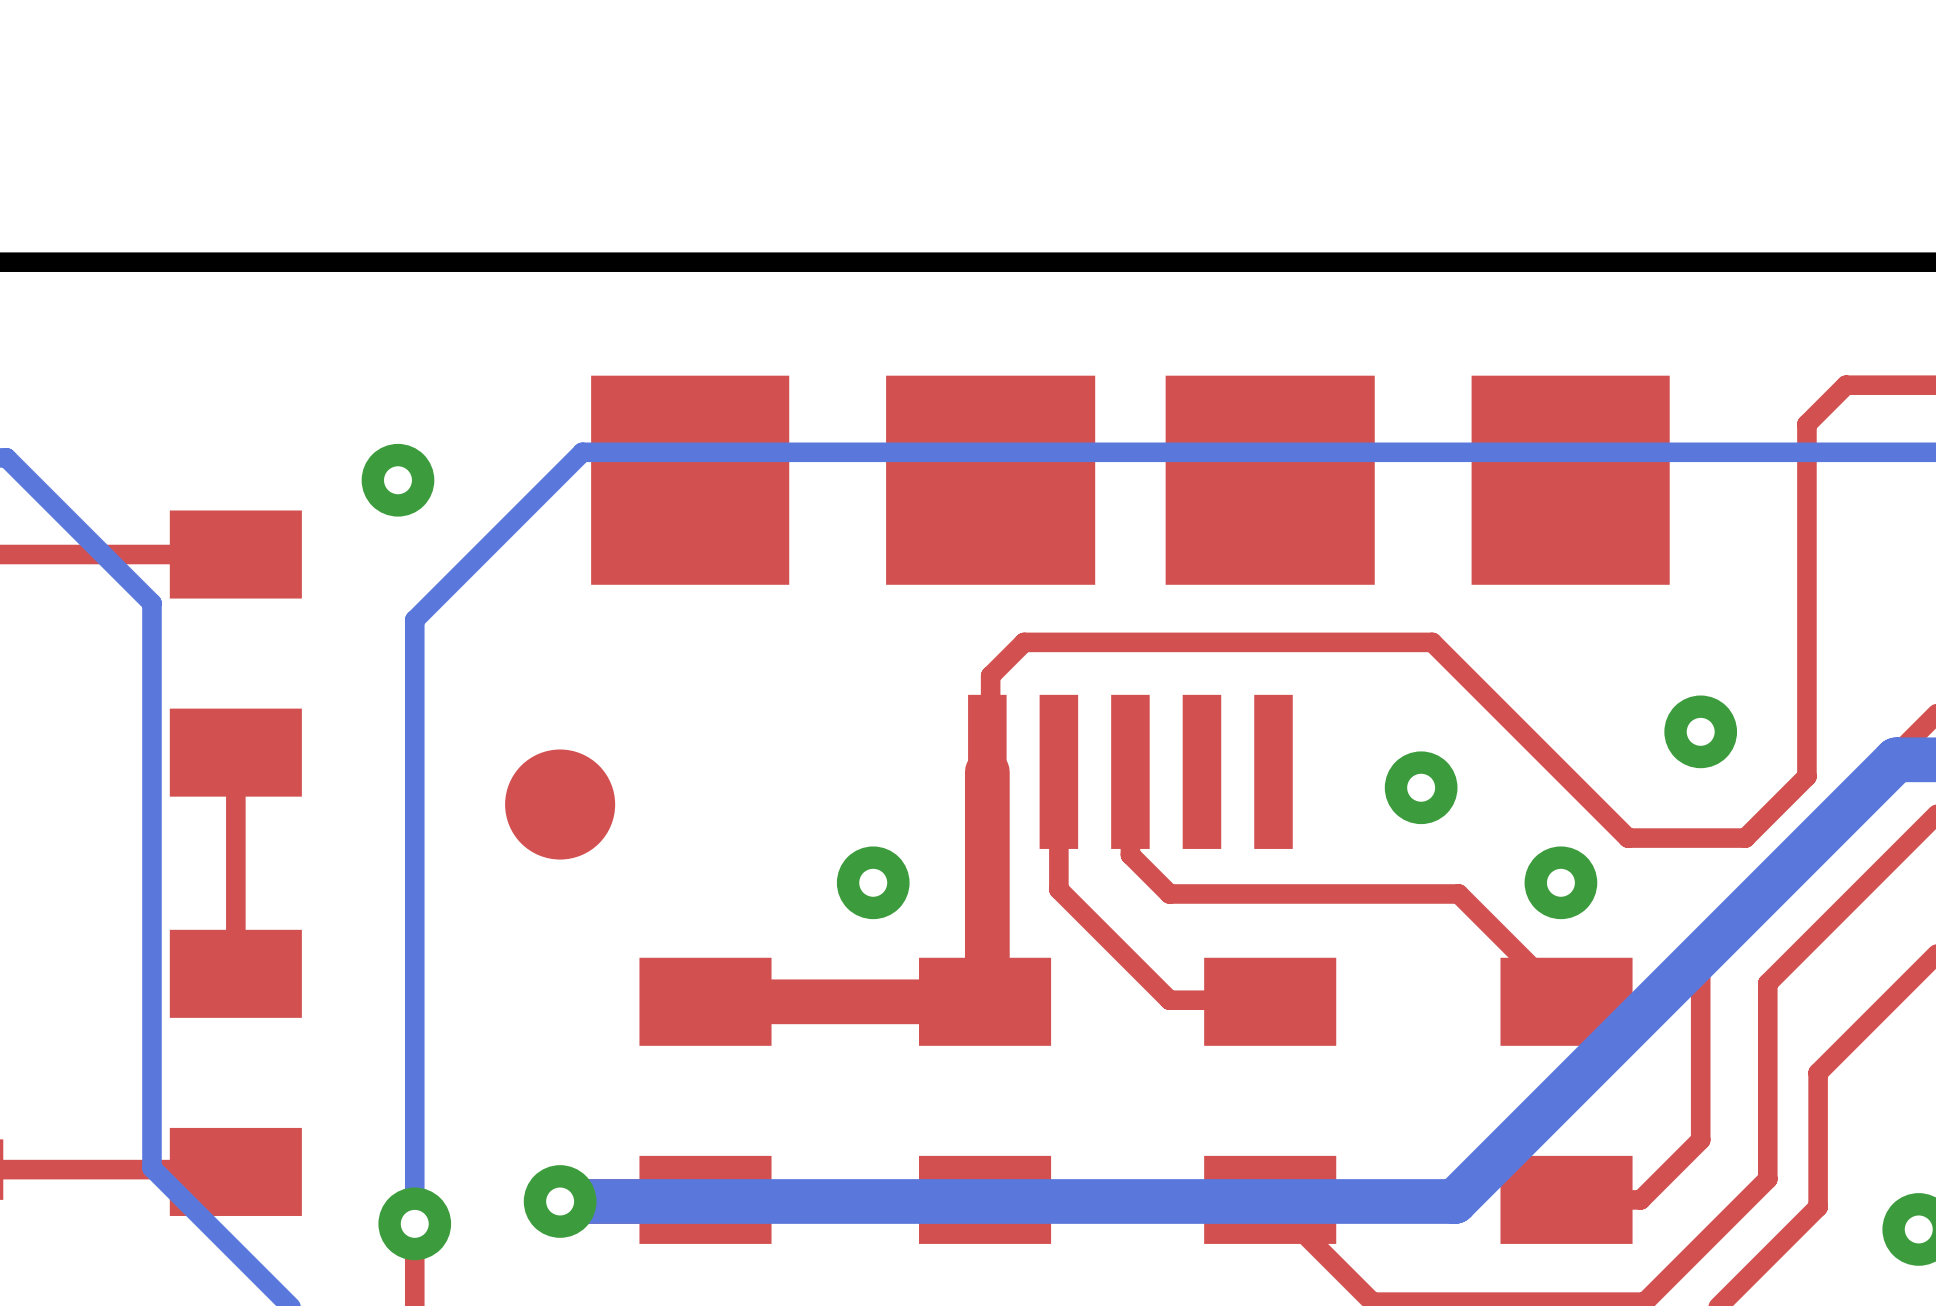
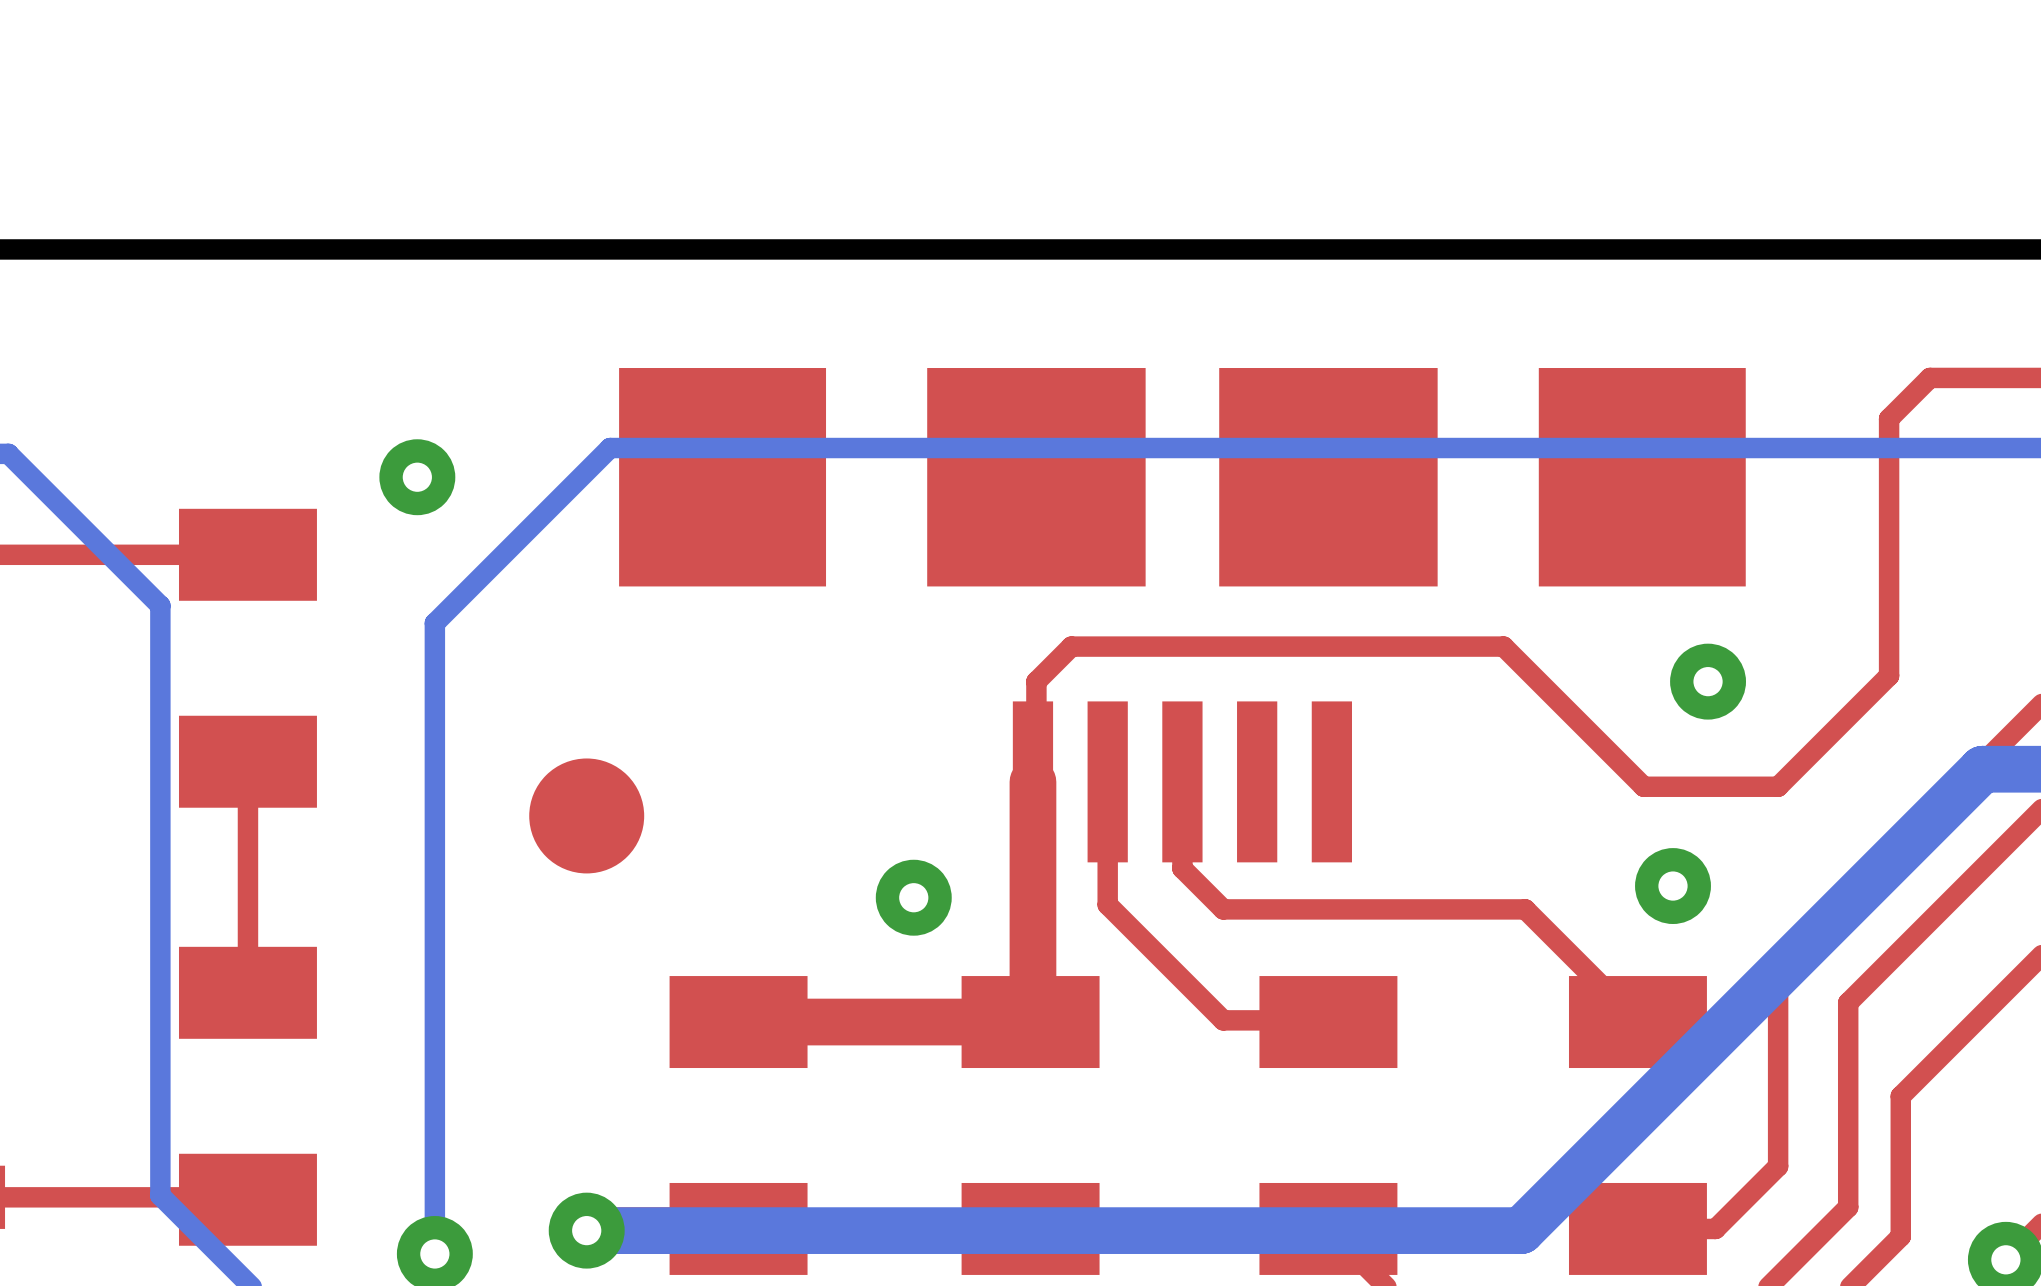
top track: (1432, 642) (1628, 838) (1745, 838) (1806, 776) (1806, 670) -> (1497, 646) (1503, 646) (1643, 786) (1778, 786) (1889, 675)
via position: (1700, 731) -> (1708, 681)
via: (1421, 787) -> none
via position: (1560, 882) -> (1673, 886)

